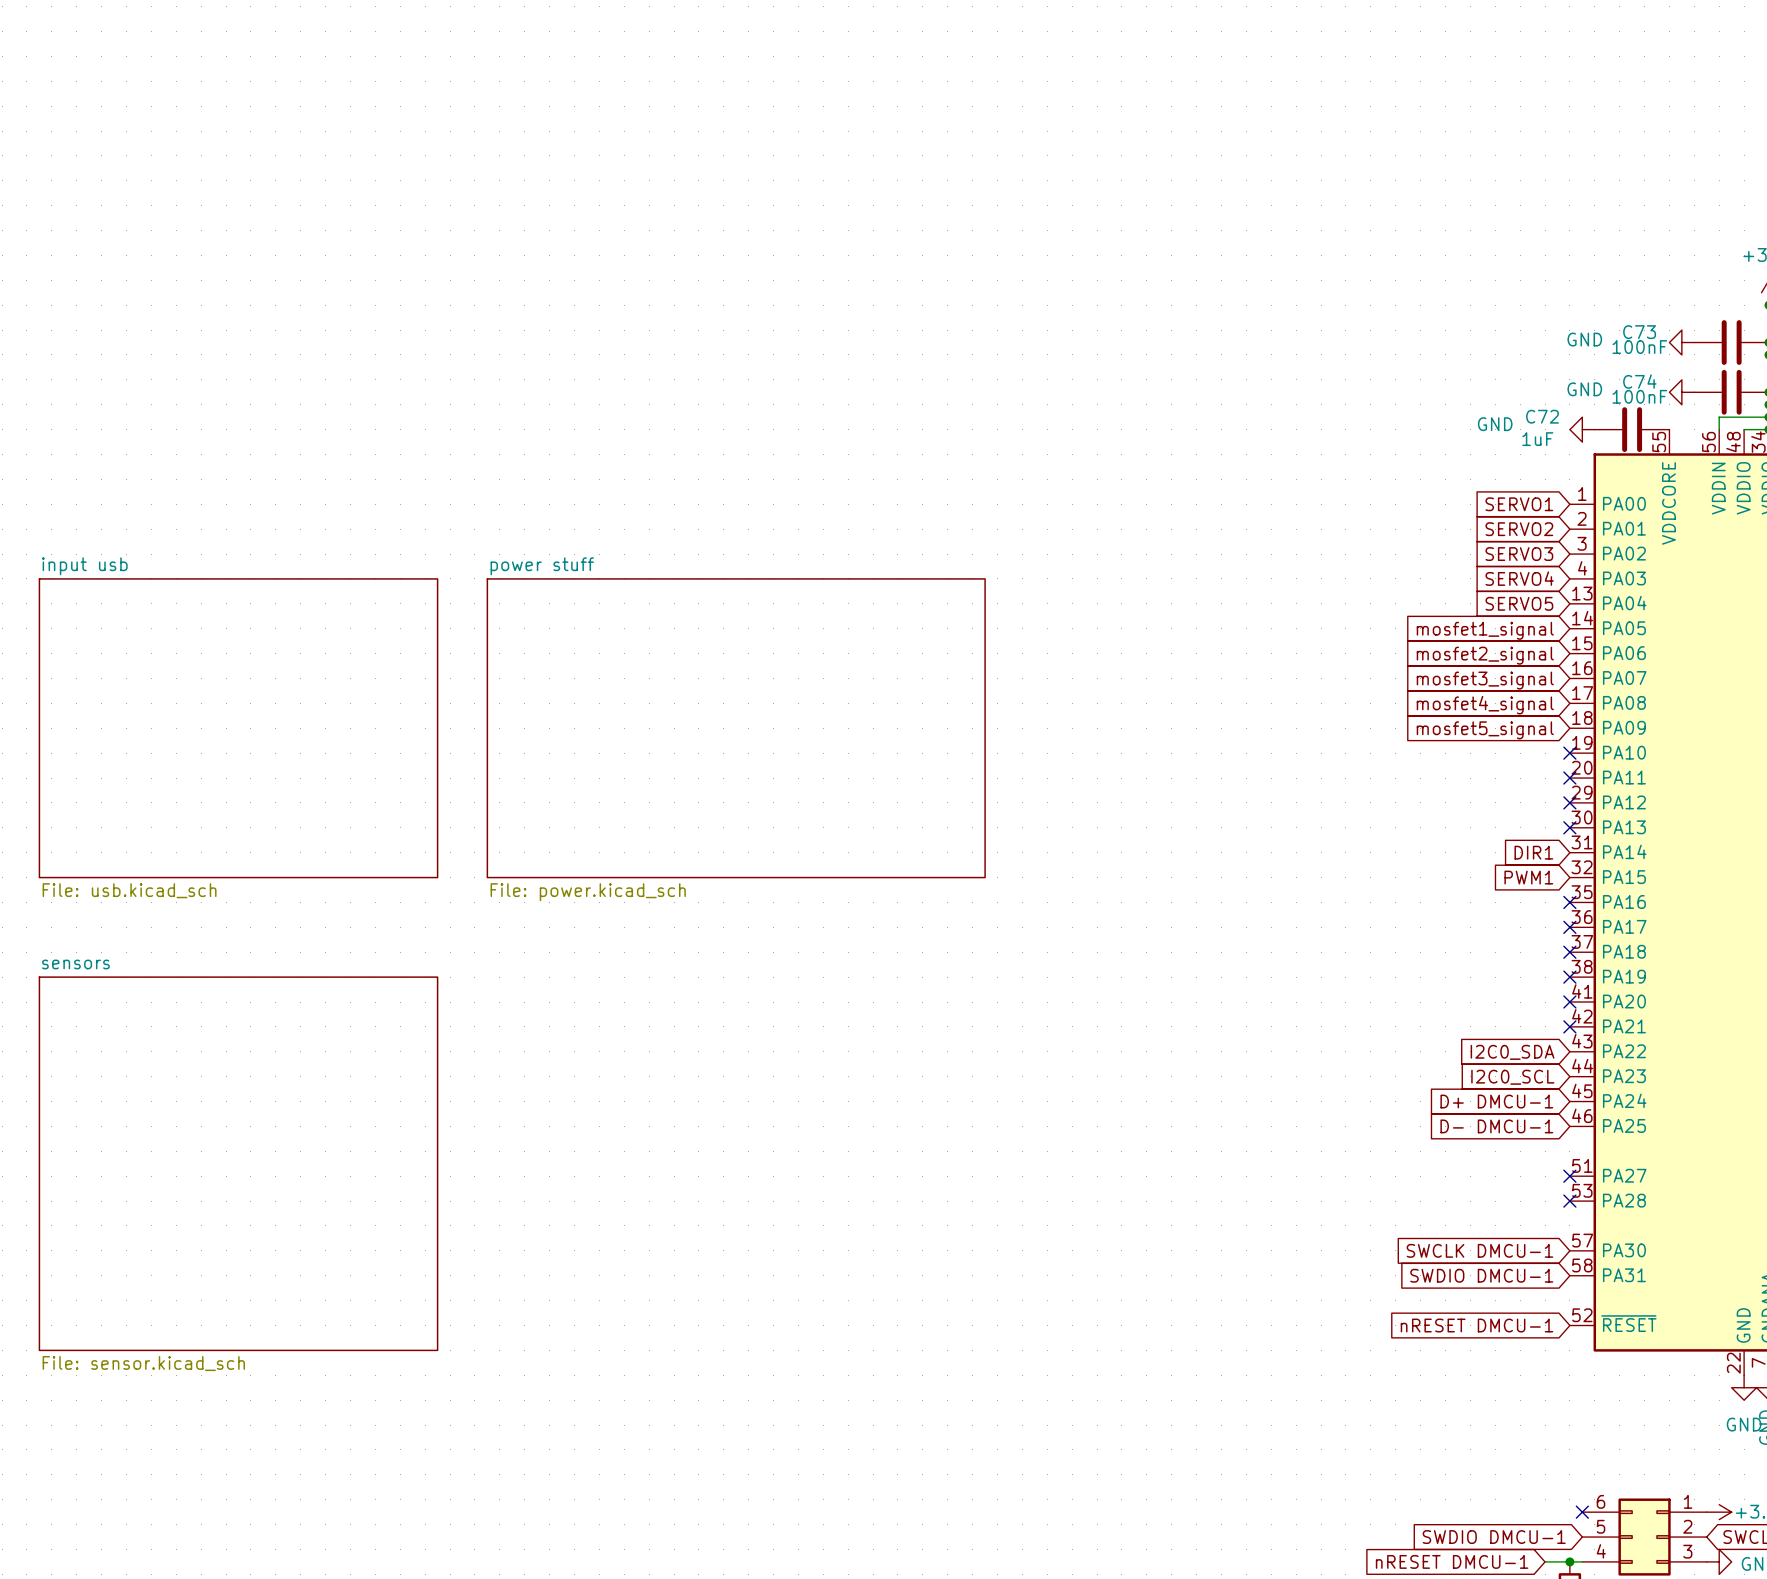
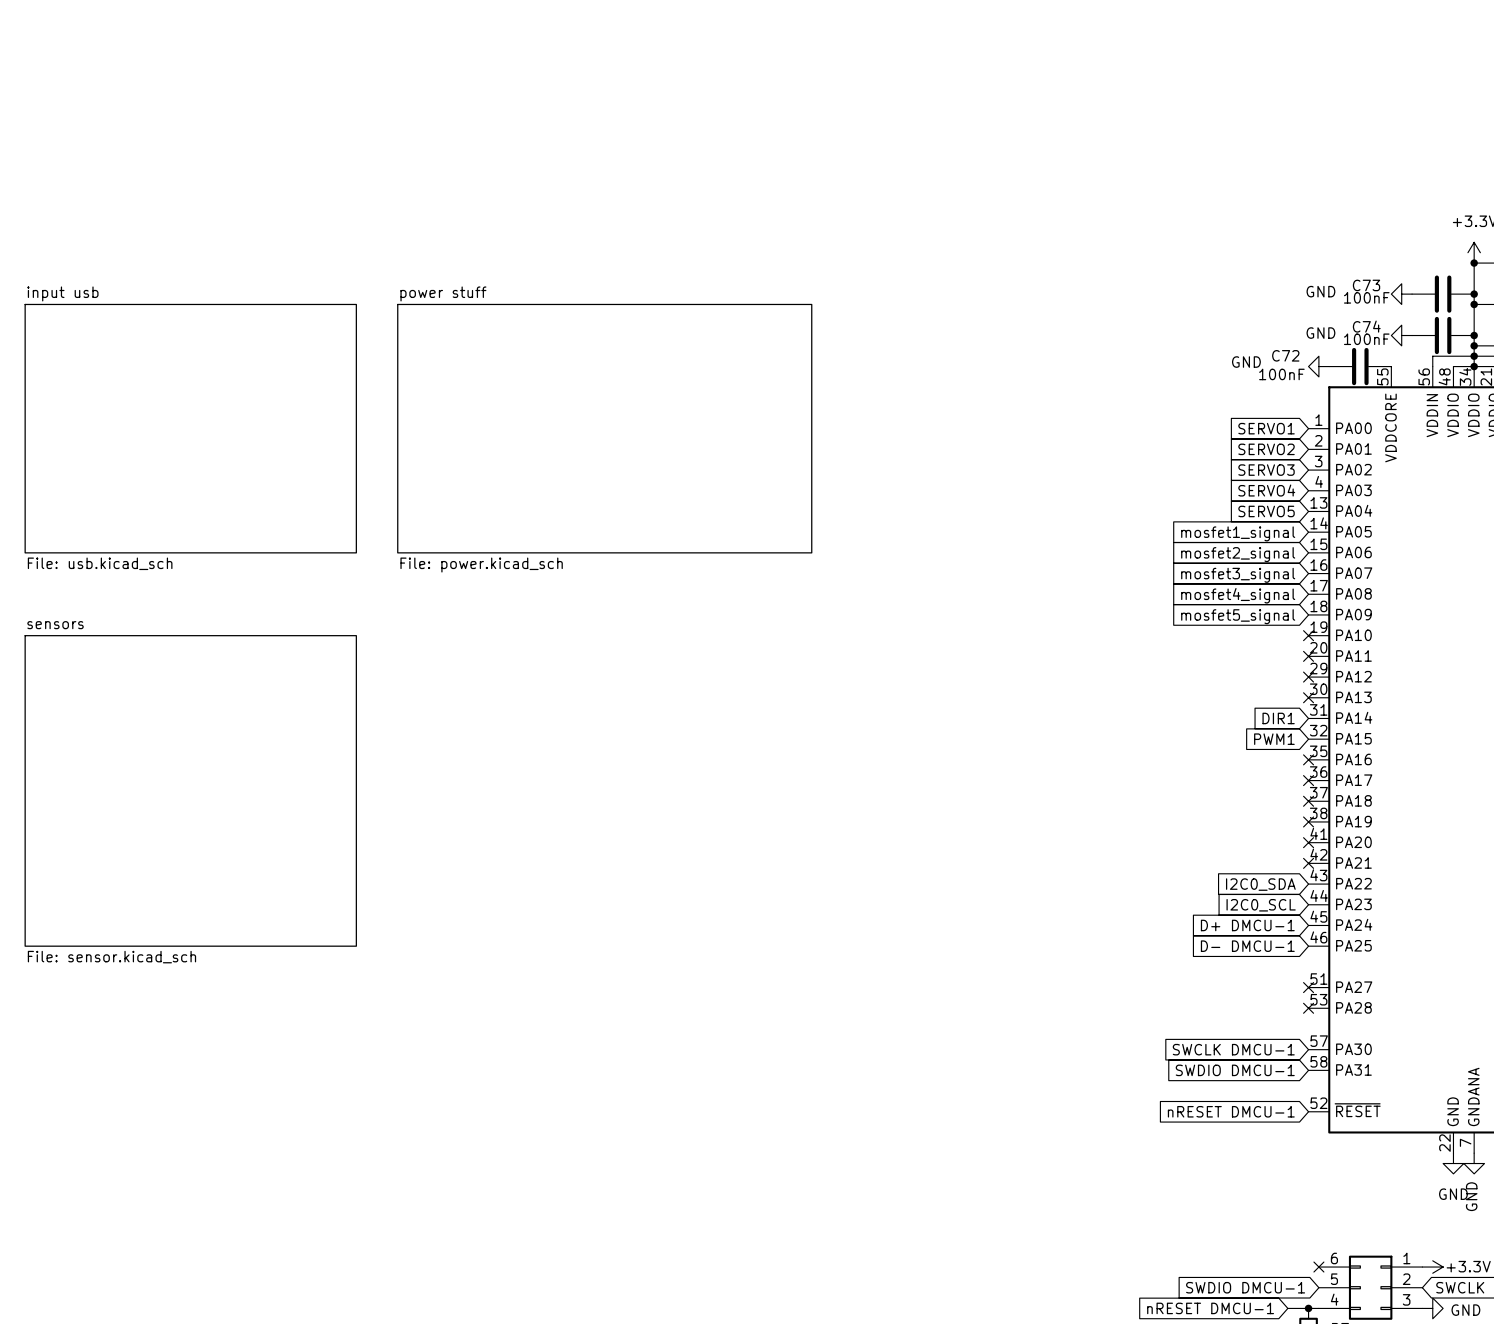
C72 value: 1uF (1537, 439) -> 100nF (1281, 374)
sheet input usb position: (238, 728) -> (190, 428)
sheet power stuff position: (736, 728) -> (604, 428)
sheet sensors position: (238, 1163) -> (190, 790)

